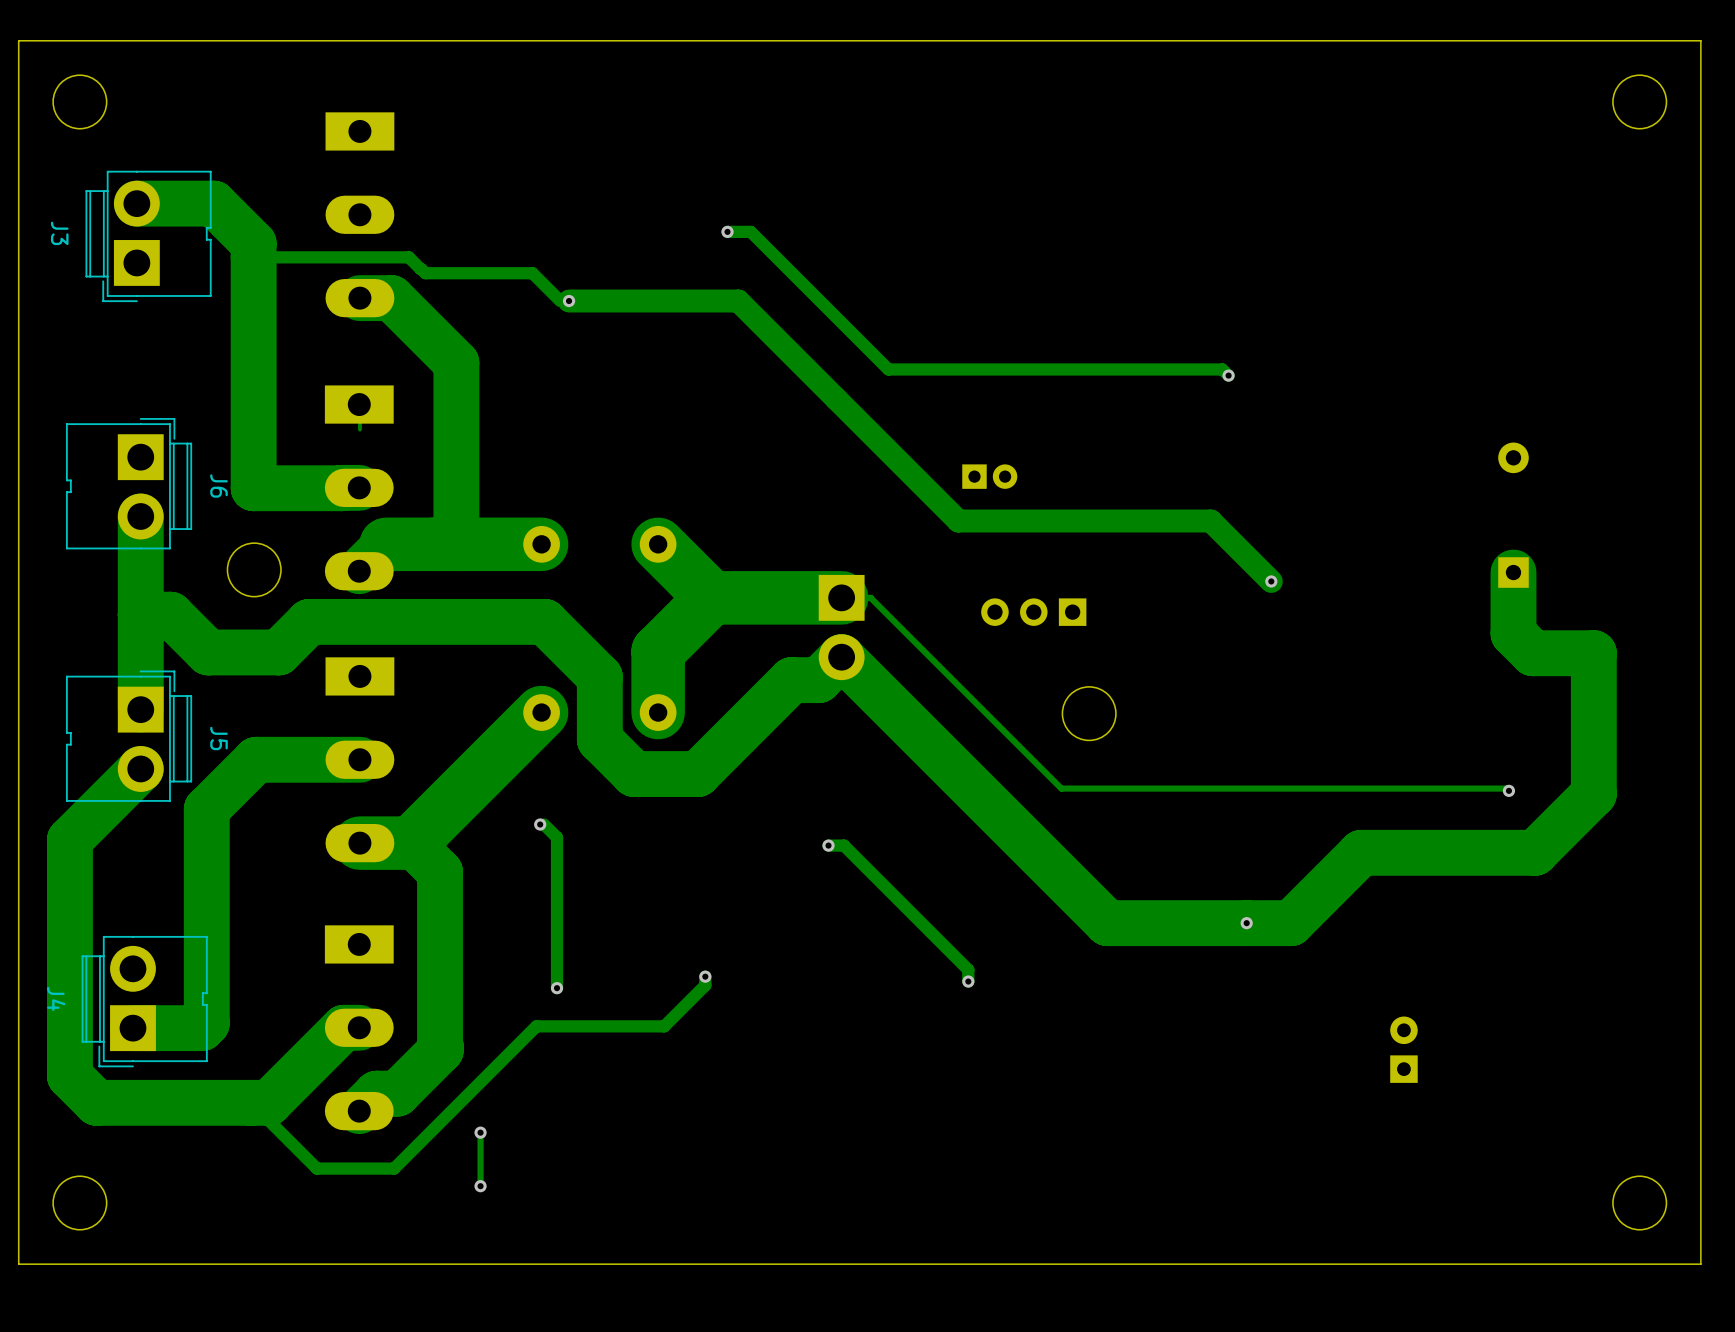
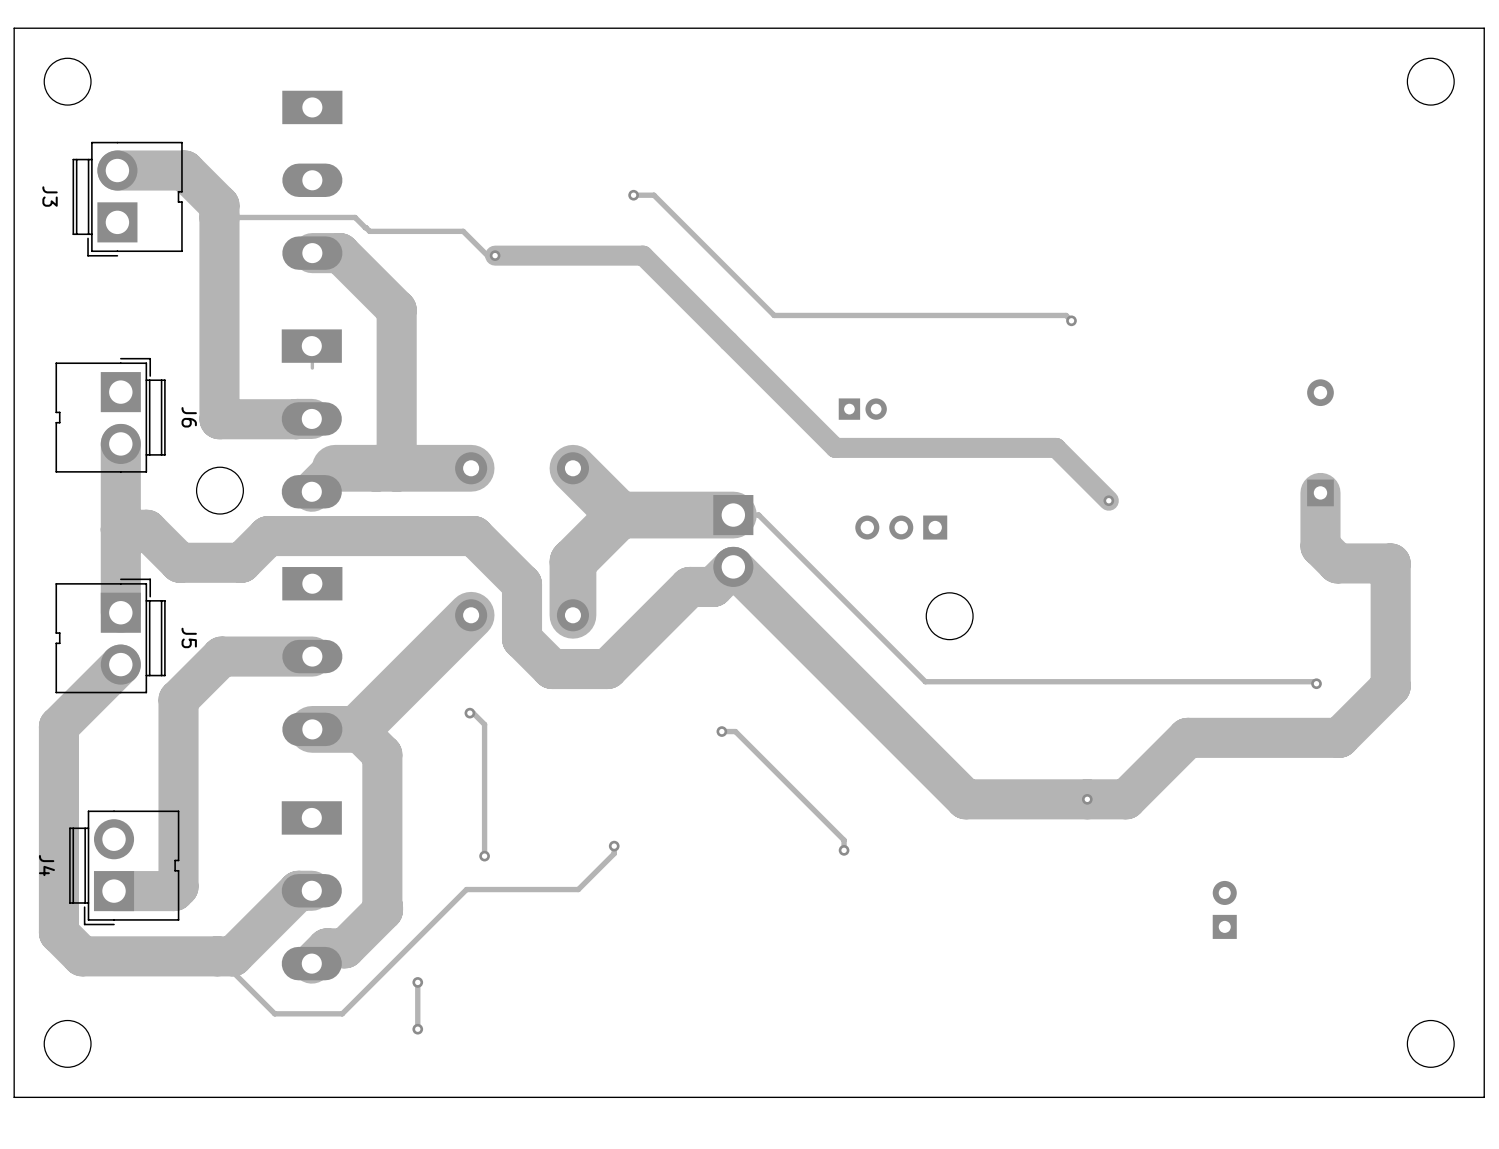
track width: thick (727, 231) (750, 231) (888, 369) (1222, 369) (1228, 375) -> thin (633, 195) (653, 195) (774, 315) (1066, 315) (1071, 320)
track width: thick (253, 257) (408, 257) (425, 273) (532, 273) (560, 301) -> thin (219, 217) (355, 217) (369, 231) (463, 231) (487, 255)
track width: thick (544, 824) (557, 837) (557, 988) -> thin (473, 713) (484, 724) (484, 856)
track width: thick (828, 845) (844, 845) (968, 969) (968, 981) -> thin (721, 731) (735, 731) (844, 840) (844, 850)
track width: thick (705, 976) (705, 985) (664, 1026) (536, 1026) (394, 1168) (316, 1168) (251, 1102) -> thin (614, 846) (614, 853) (578, 889) (466, 889) (342, 1013) (274, 1013) (217, 956)

